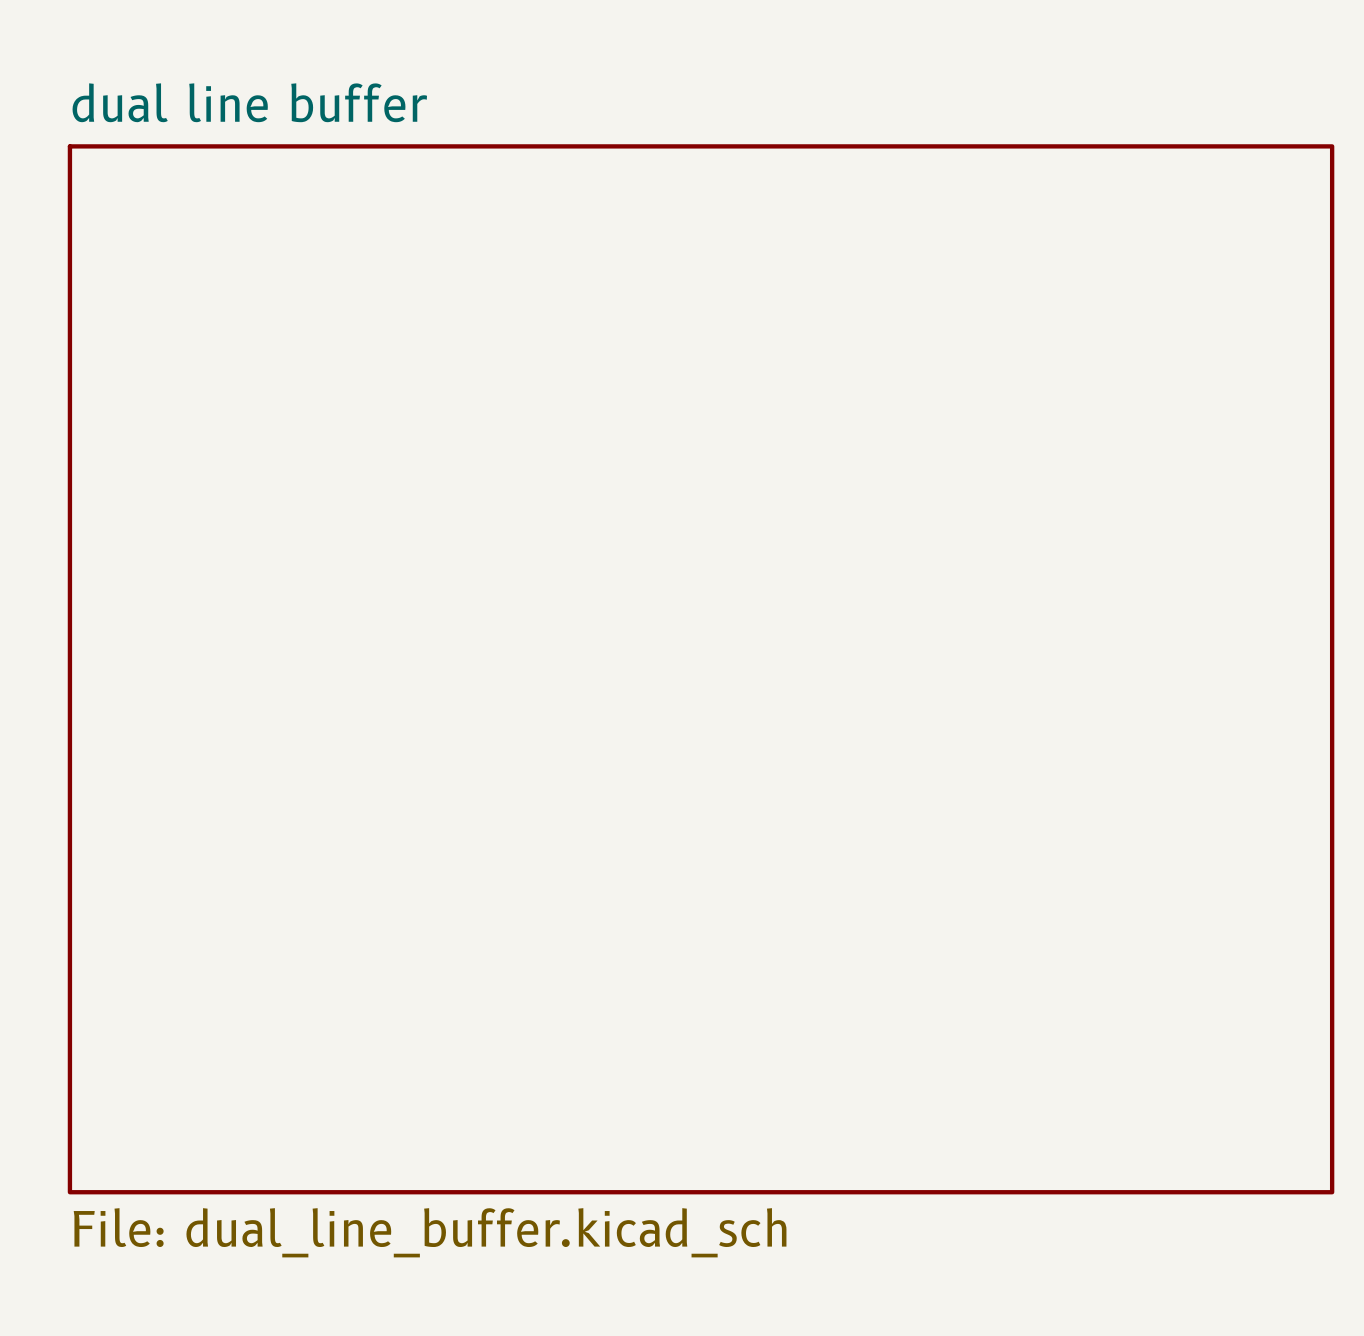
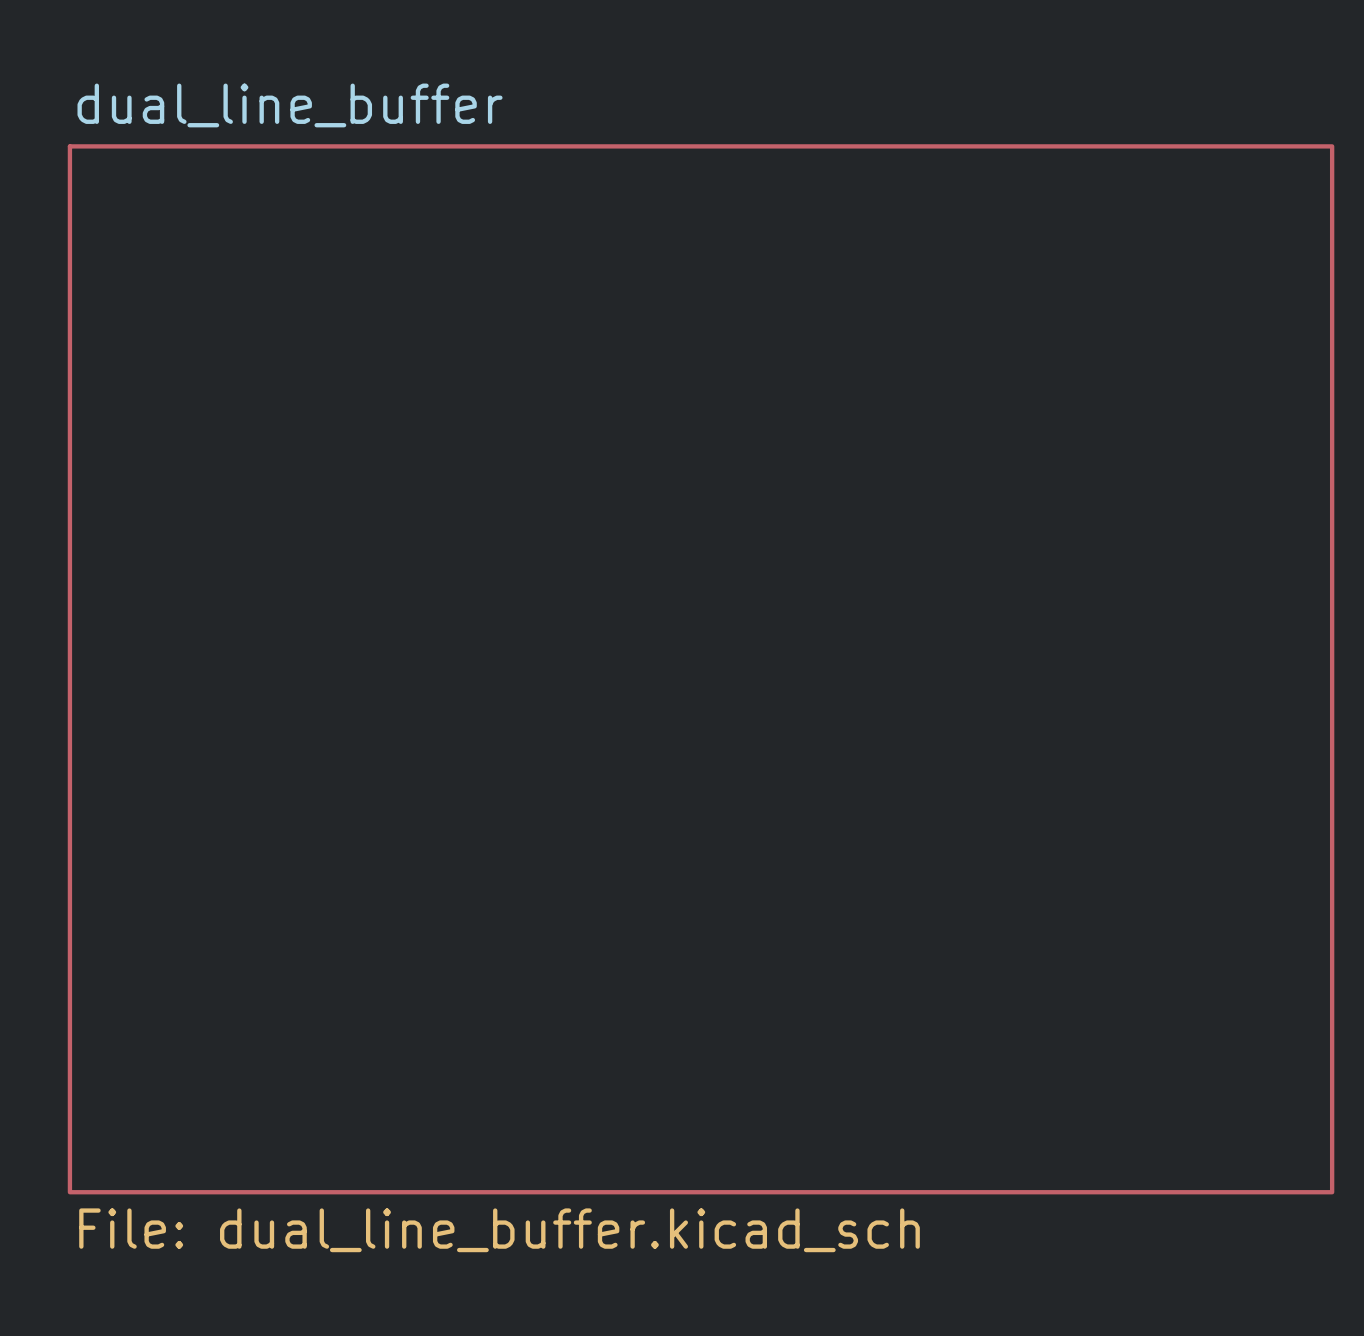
sheet dual line buffer name: dual line buffer (249, 102) -> dual_line_buffer (290, 105)

